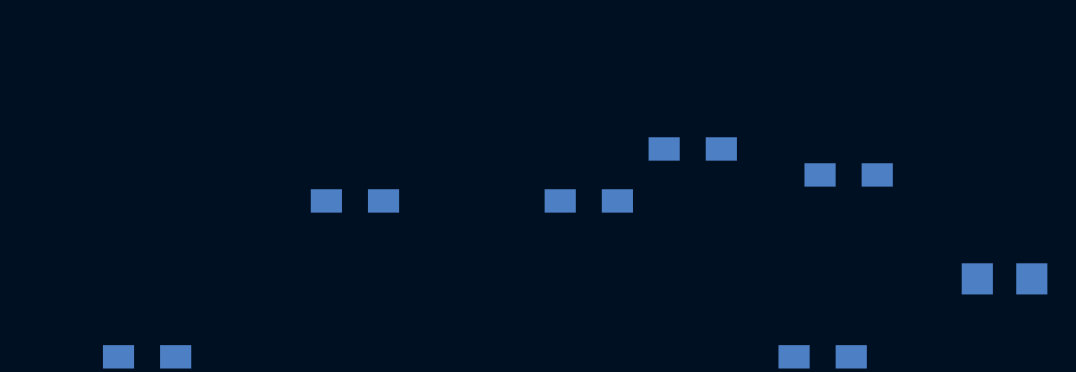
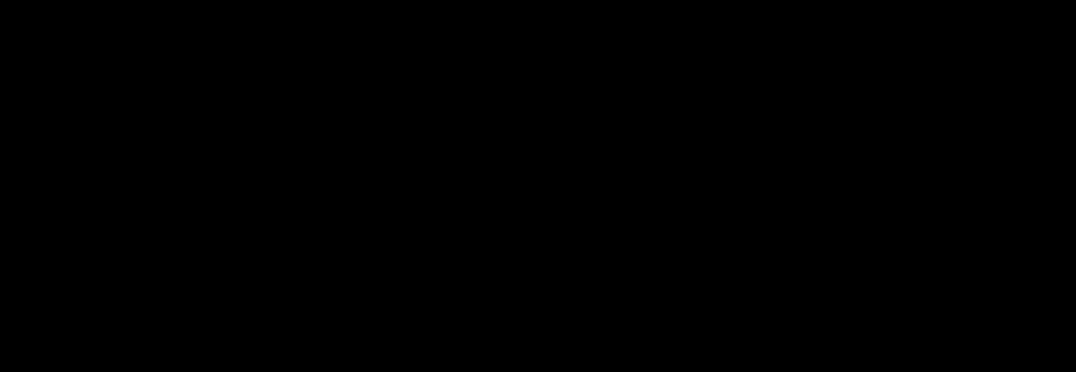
part: (692, 148) -> none
part: (848, 174) -> none
part: (354, 200) -> none
part: (588, 200) -> none
part: (1004, 278) -> none
part: (147, 356) -> none
part: (822, 356) -> none

